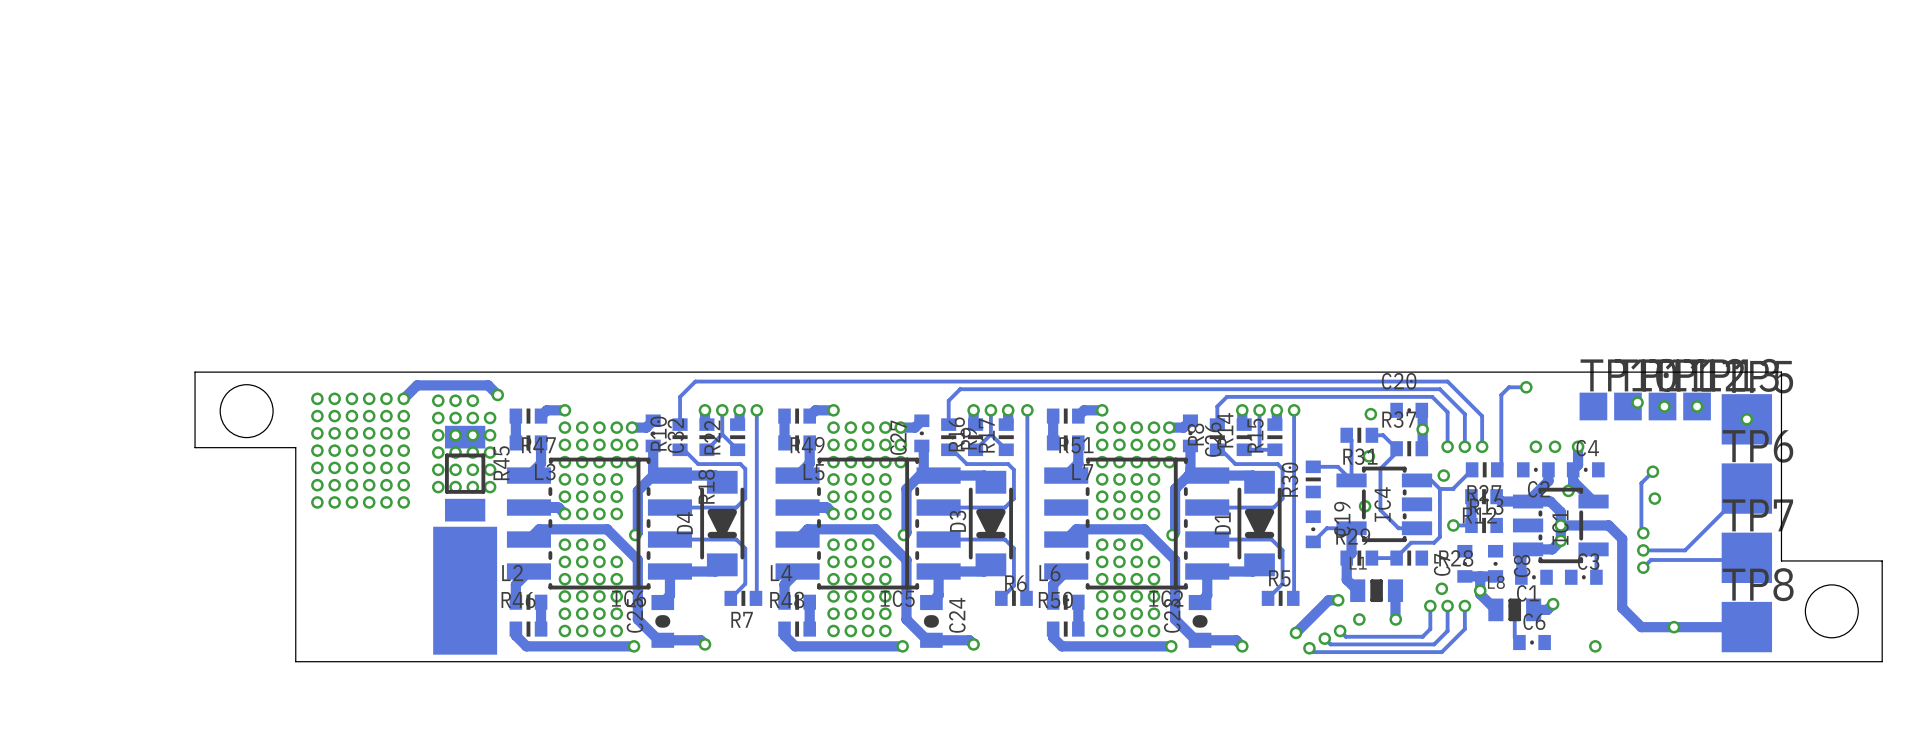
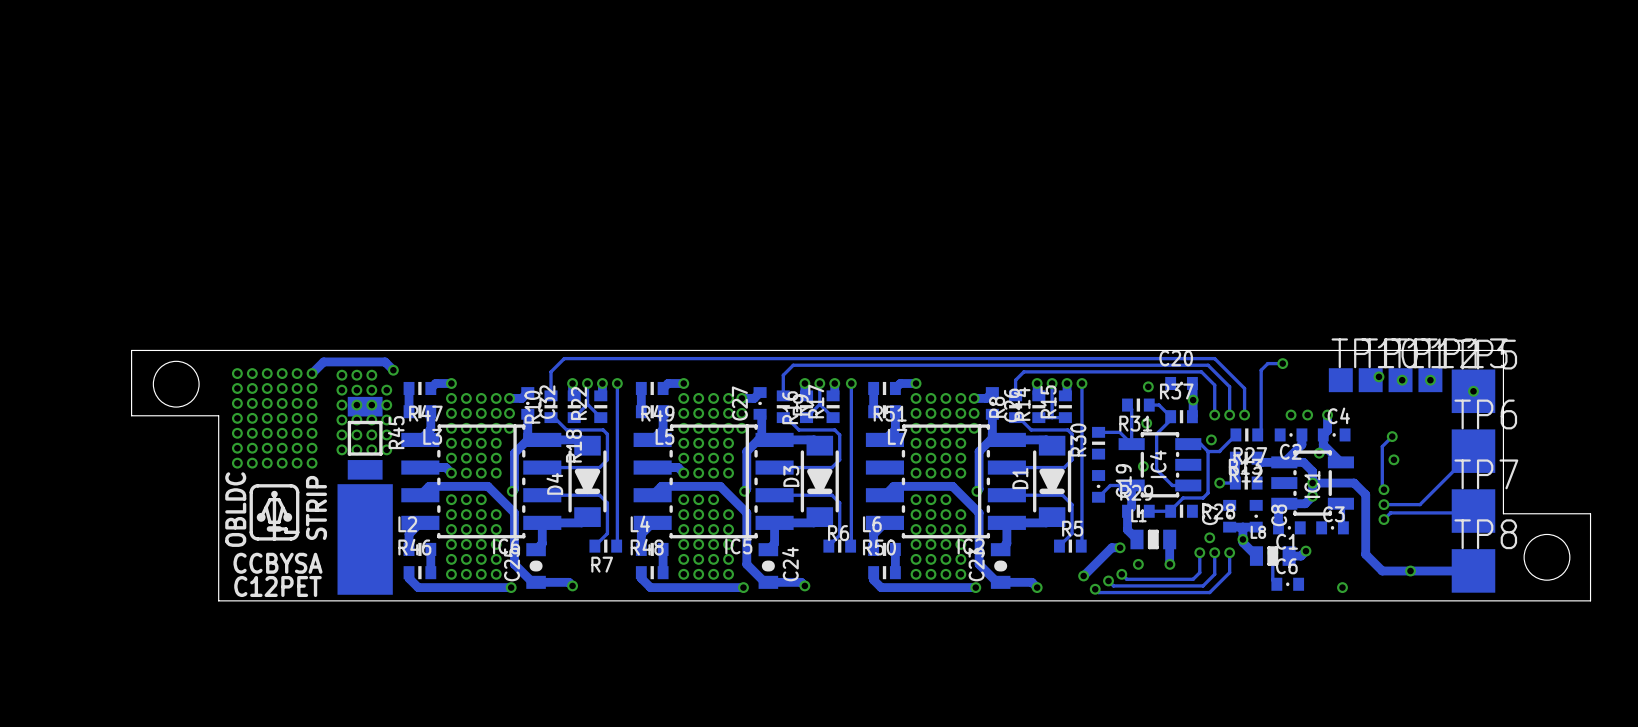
drawing: none -> [249, 484, 300, 541]
text: none -> STRIP (316, 507)
text: none -> OBLDC (235, 509)
text: none -> CCBYSA (277, 563)
text: none -> C12PET (277, 586)

